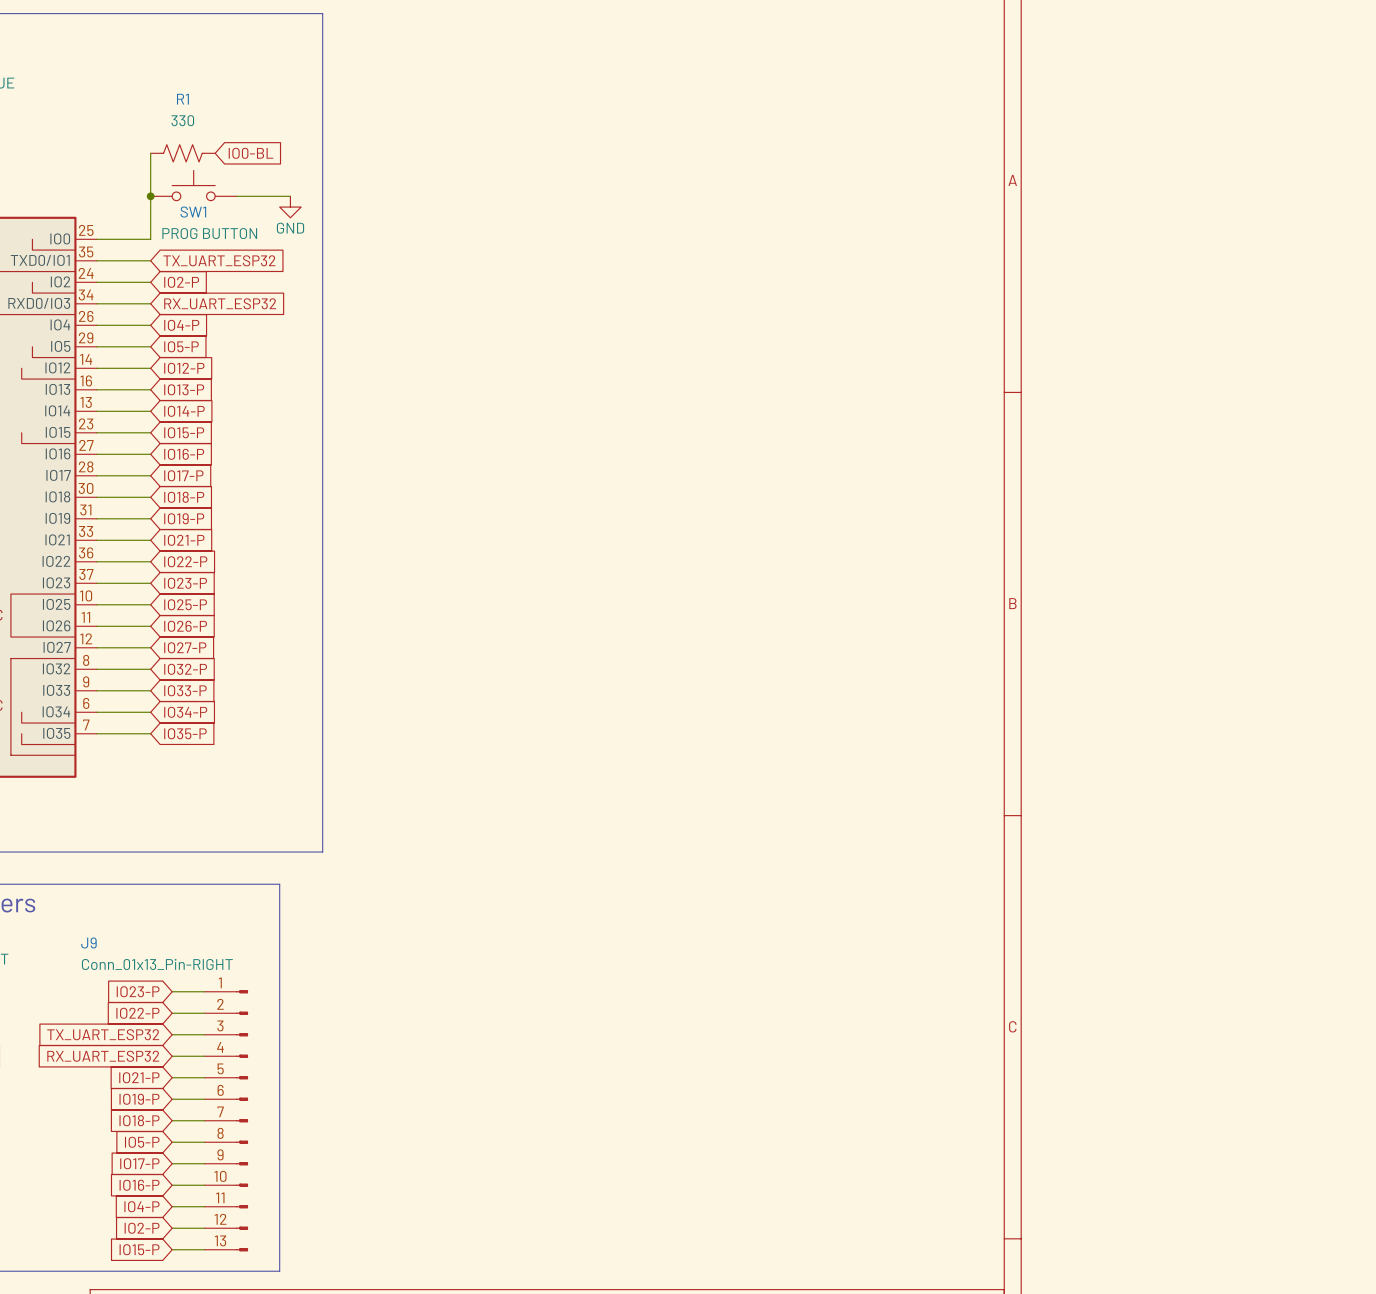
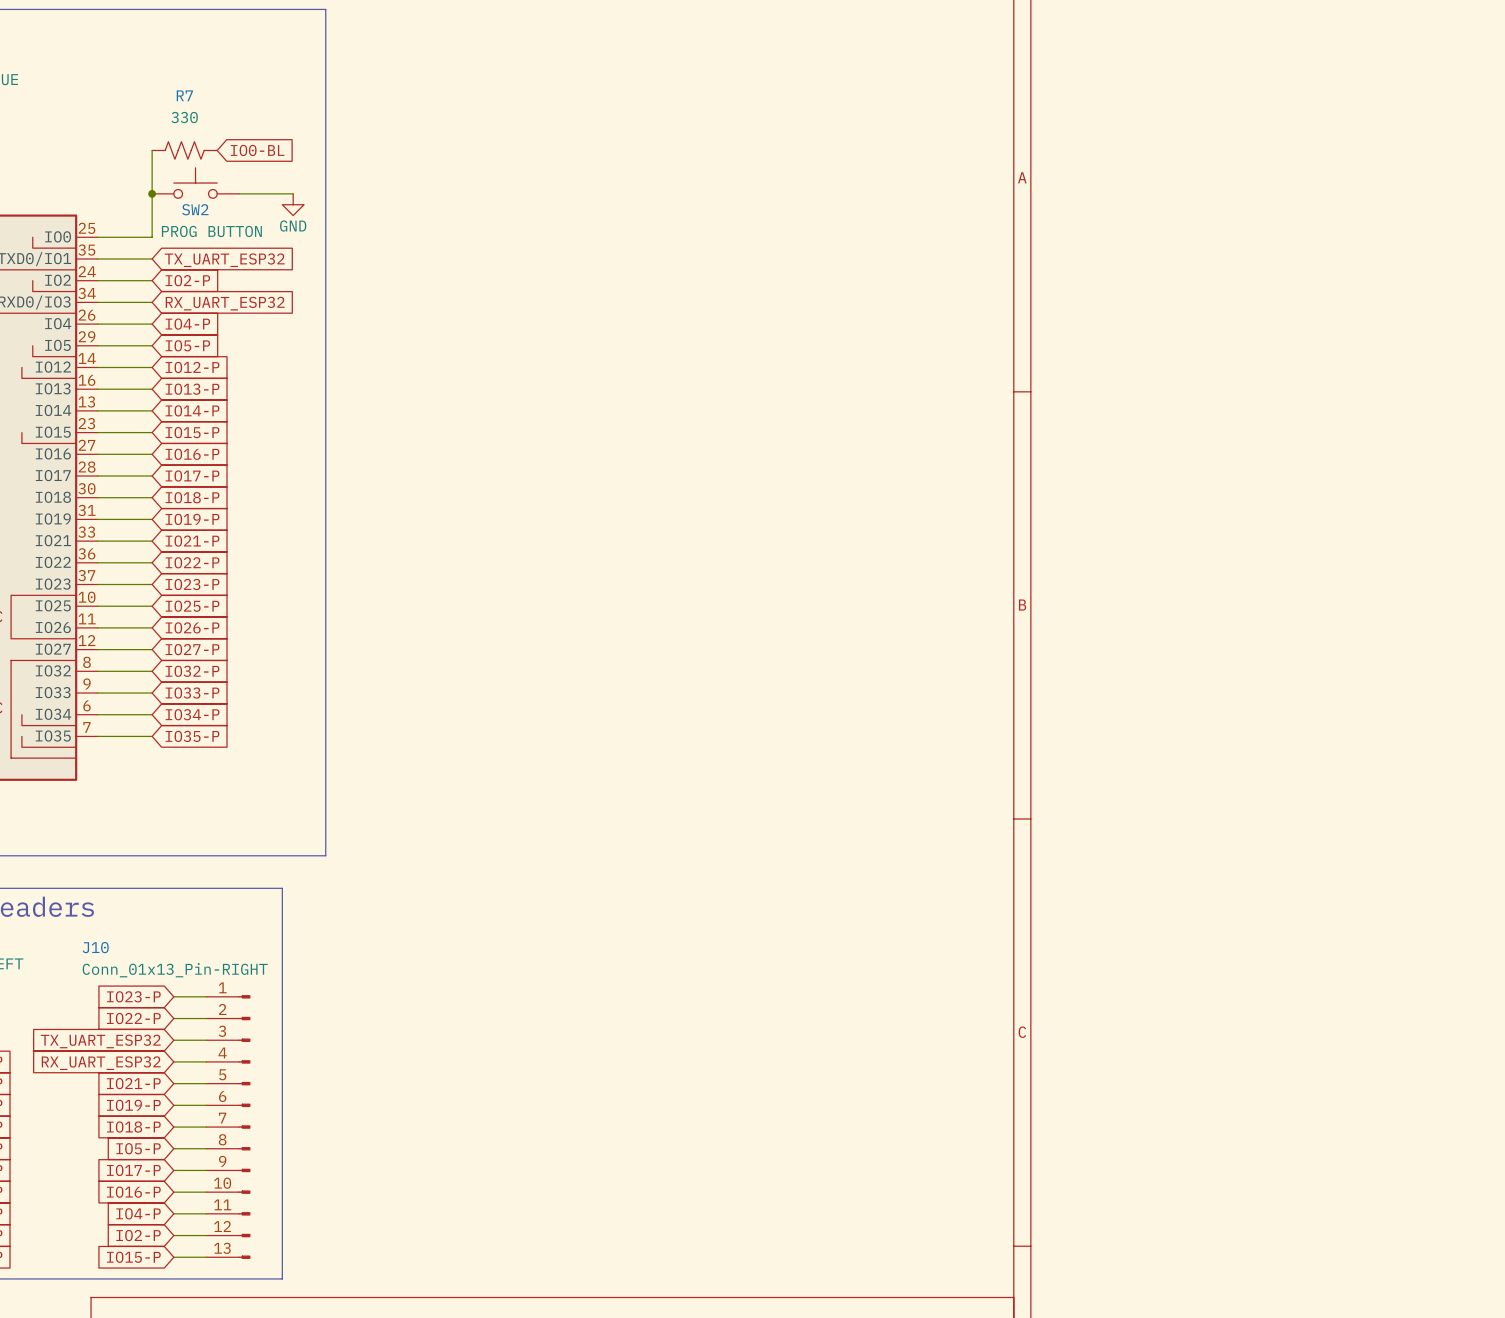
R1 name: R1 (182, 99) -> R7 (184, 95)
SW1 name: SW1 (193, 212) -> SW2 (195, 209)
J9 name: J9 (88, 942) -> J10 (95, 947)

